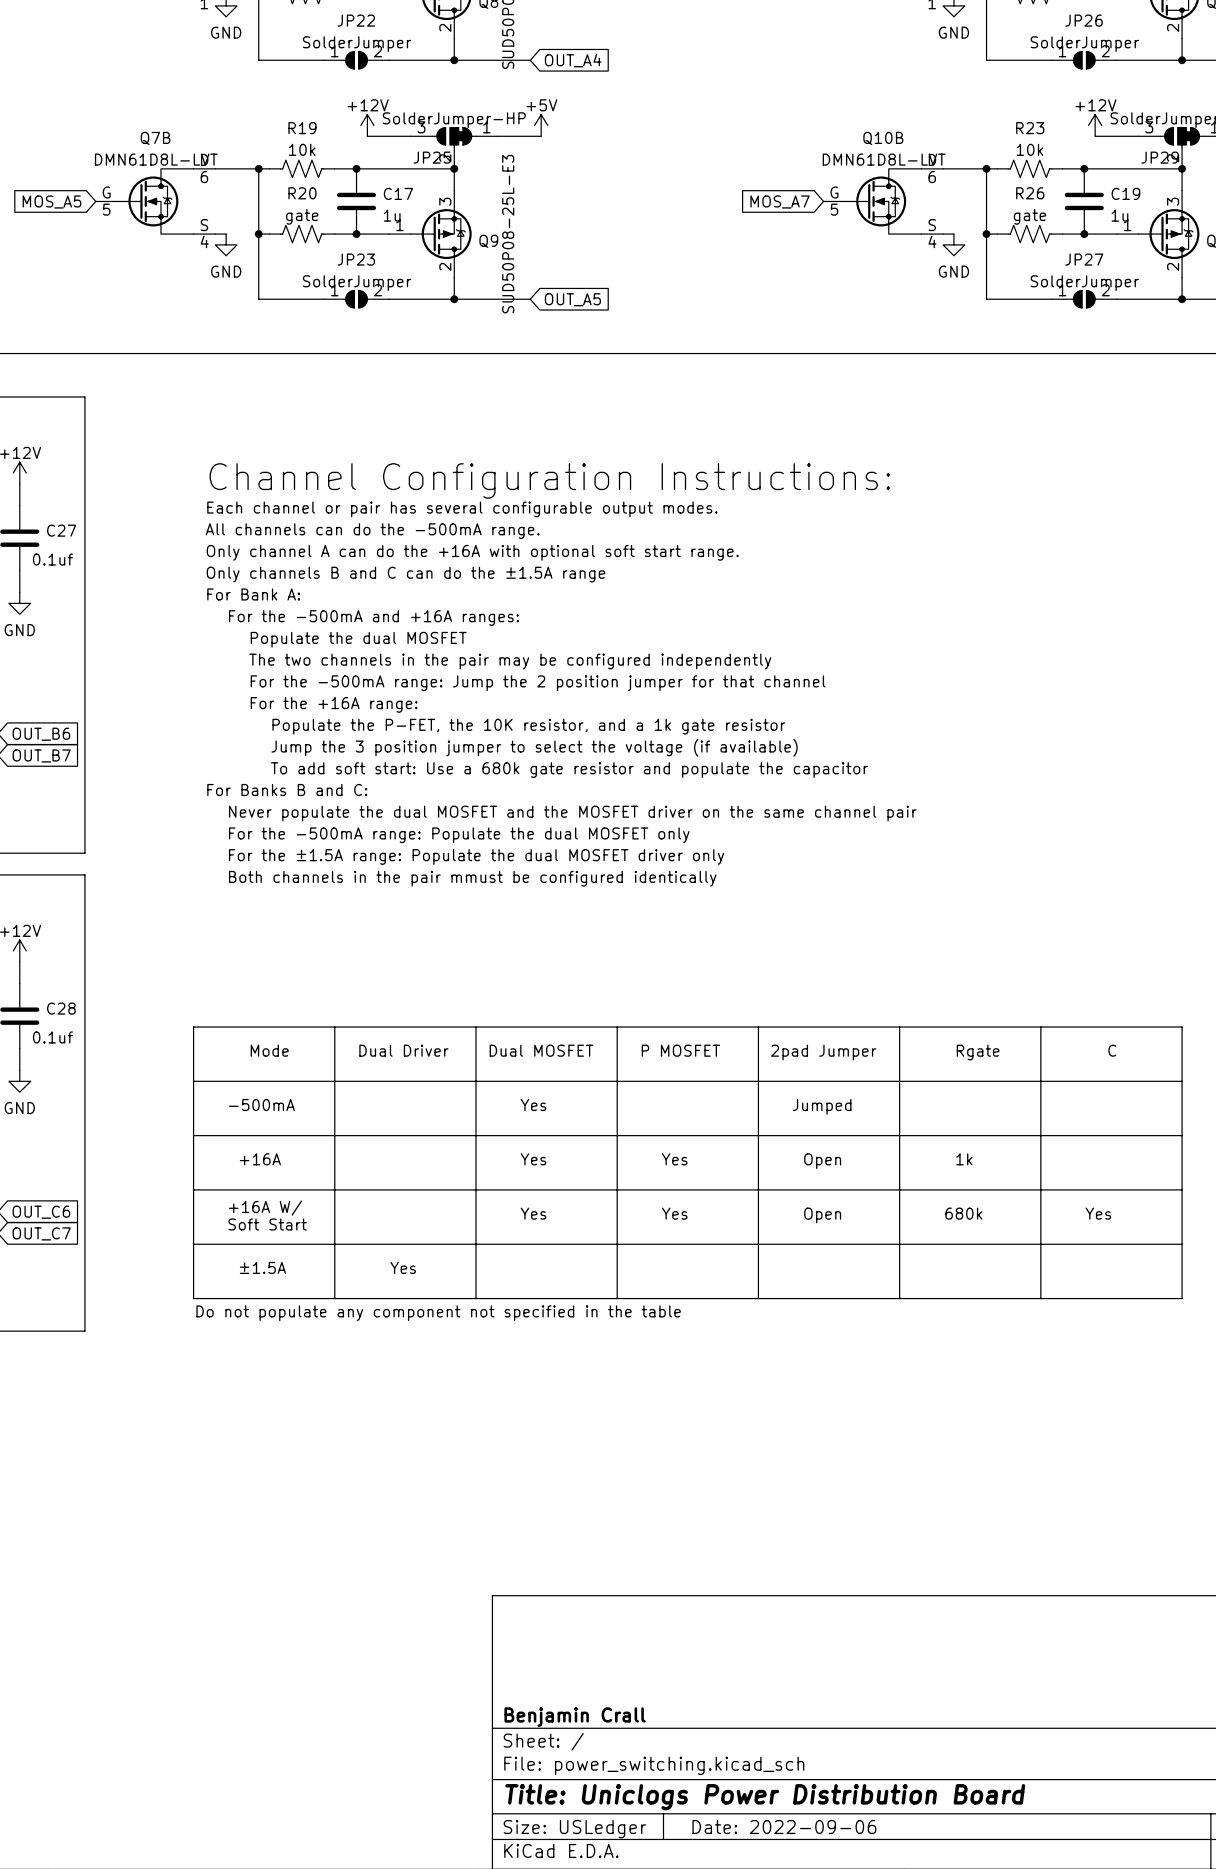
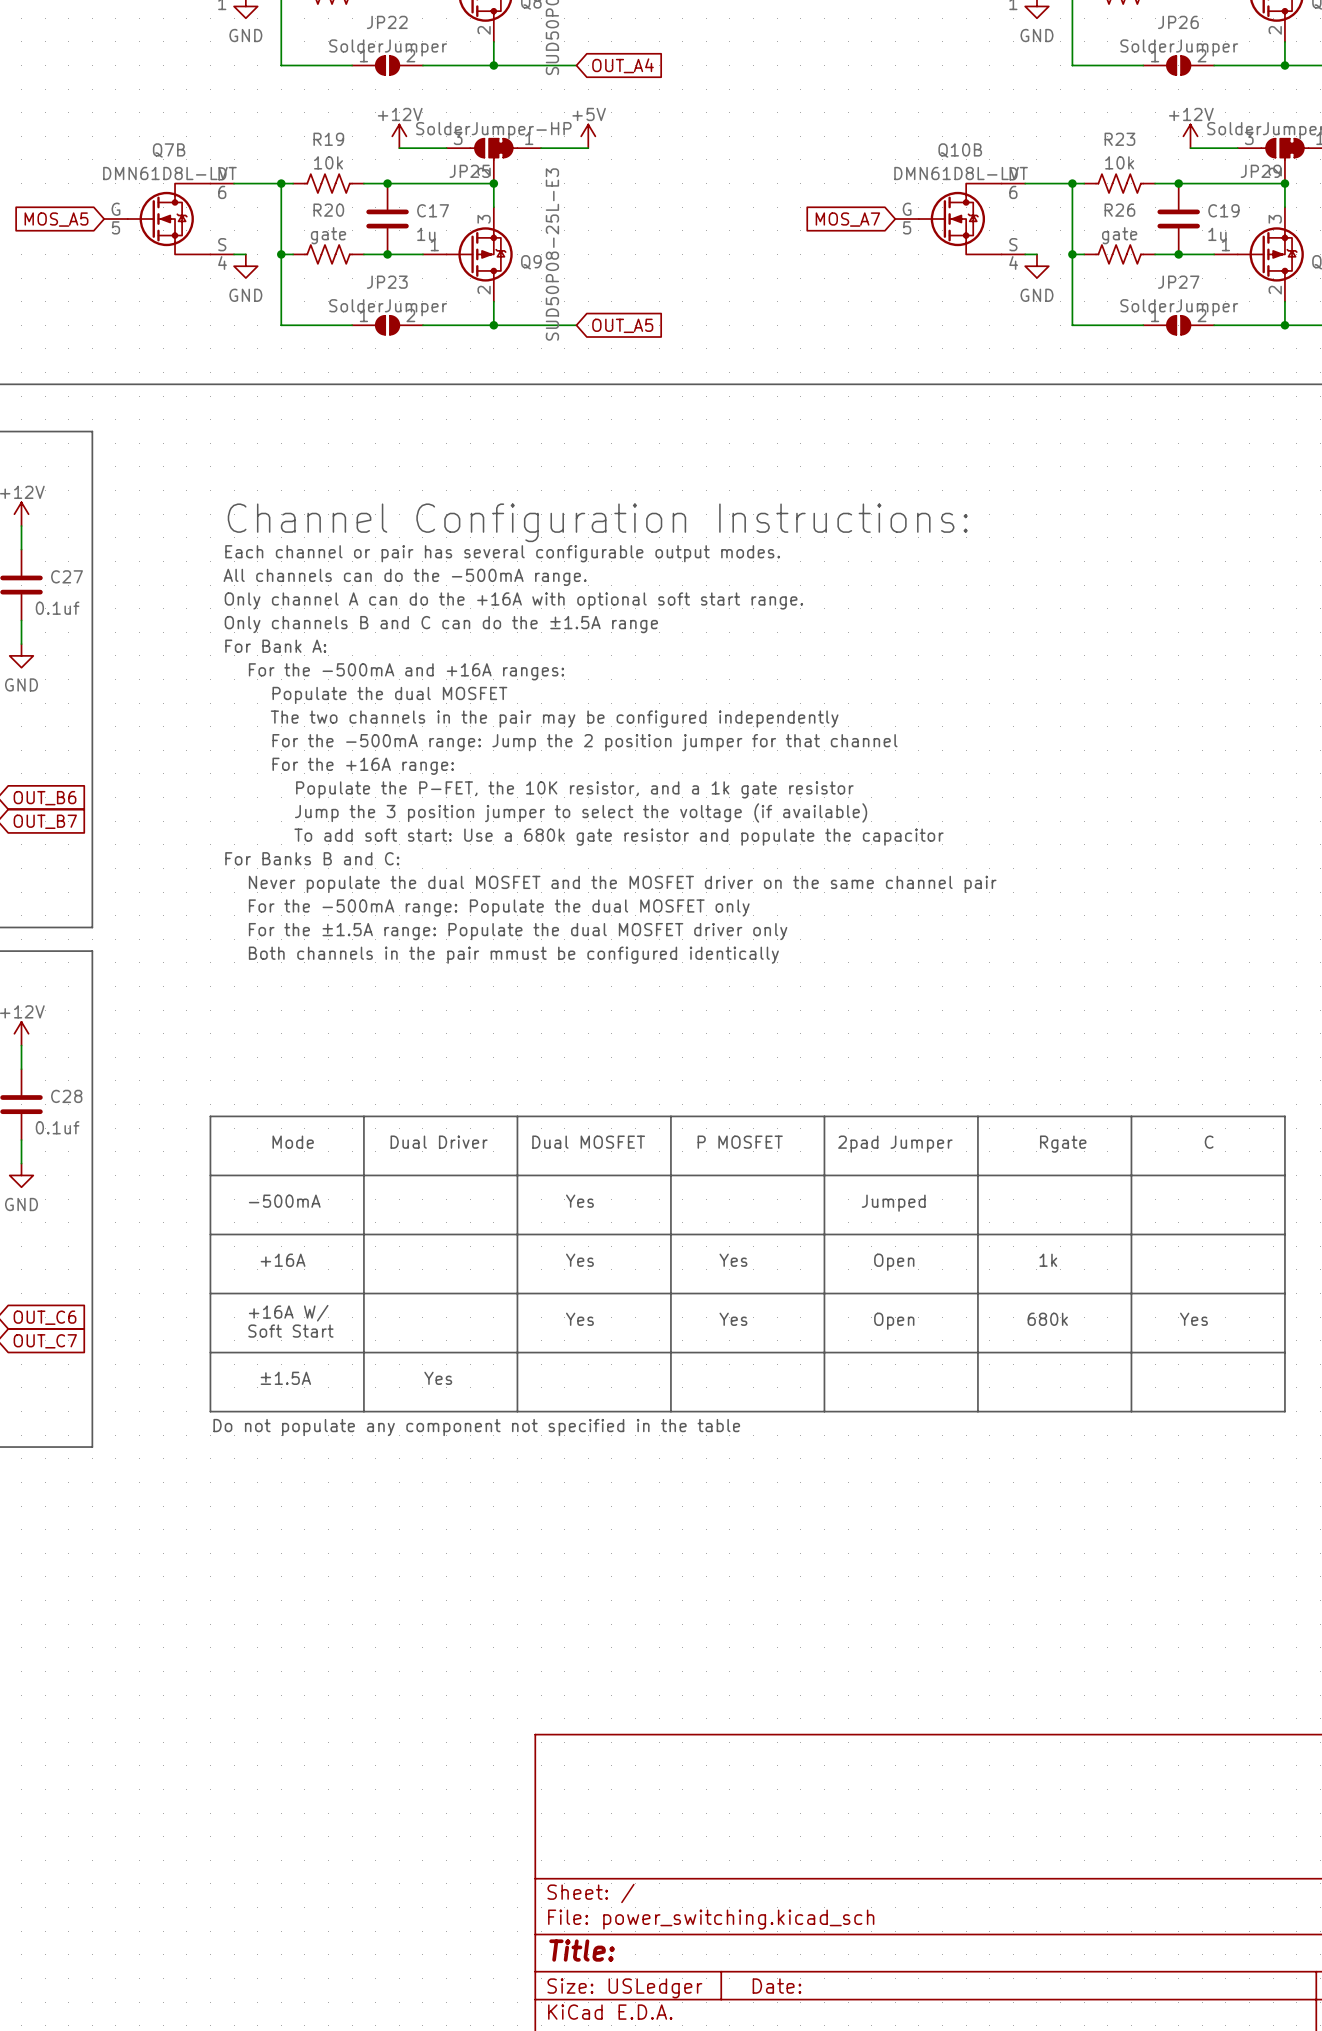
title block: Benjamin Crall (575, 1717) -> none
title block: Title: Uniclogs Power Distribution Board (765, 1797) -> Title: (582, 1950)
title block: Date: 2022-09-06 (784, 1827) -> Date: (776, 1986)

